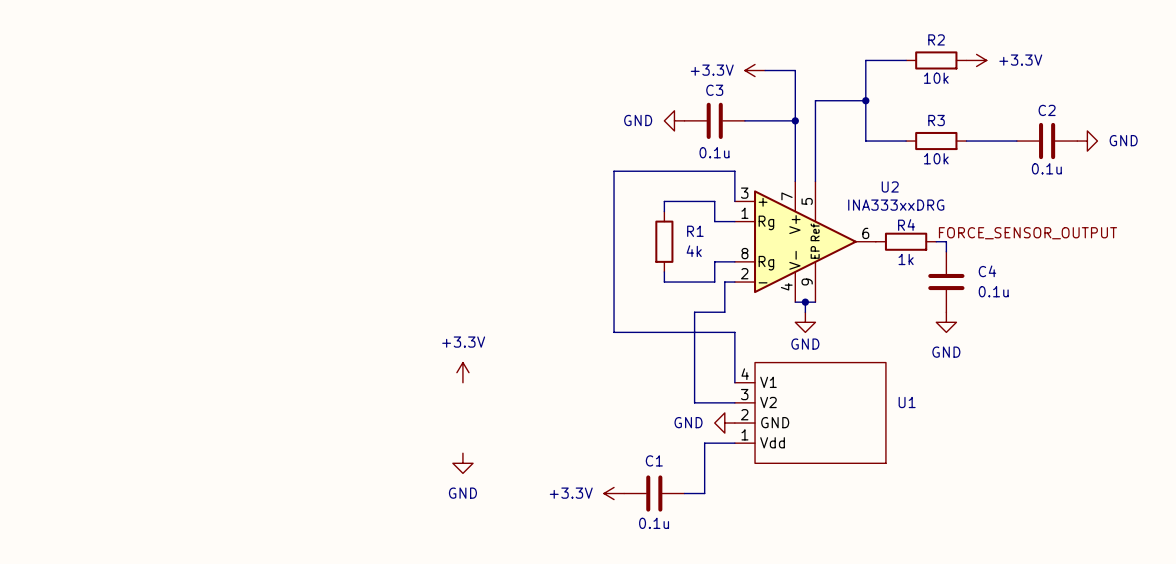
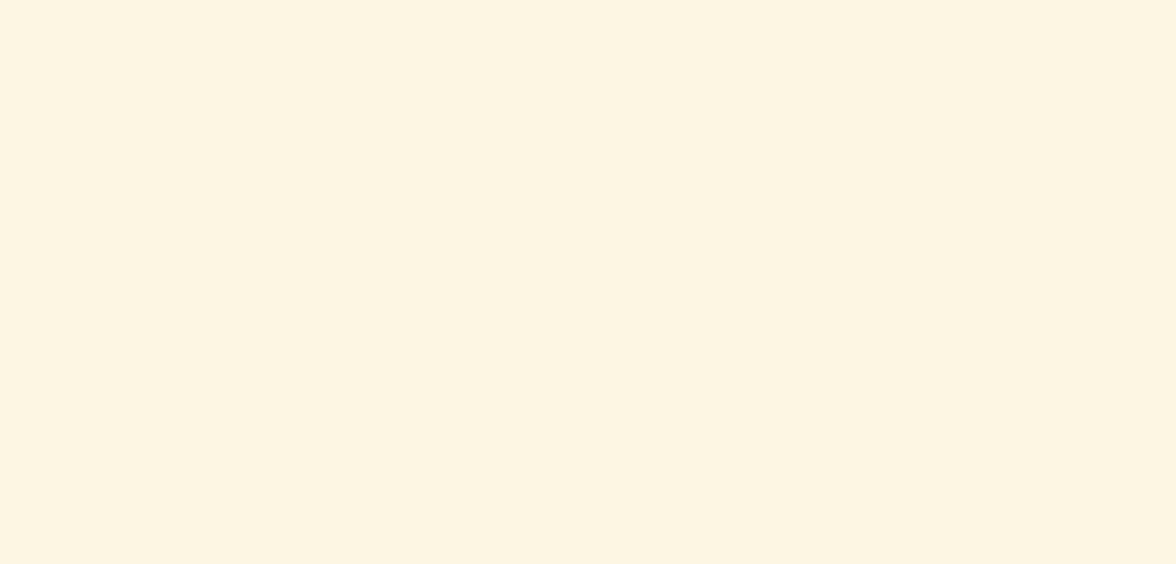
wire: (906, 60) (865, 60) (865, 141) (906, 141) -> none
R2: 10k (936, 60) -> none
power symbol: +3.3V (976, 60) -> none
power symbol: +3.3V (755, 70) -> none
wire: (765, 70) (795, 70) (795, 181) -> none
wire: (865, 100) (815, 100) (815, 181) -> none
junction: (865, 100) -> none
power symbol: GND (674, 120) -> none
C3: 0.1u (714, 120) -> none
wire: (744, 120) (795, 120) -> none
junction: (795, 120) -> none
R3: 10k (936, 141) -> none
wire: (966, 141) (1016, 141) -> none
C2: 0.1u (1047, 141) -> none
power symbol: GND (1087, 141) -> none
wire: (734, 201) (734, 171) (614, 171) (614, 332) (734, 332) (734, 382) -> none
wire: (664, 211) (664, 201) (714, 201) (714, 221) (734, 221) -> none
label: FORCE_SENSOR_OUTPUT (1027, 233) -> none
R1: 4k (664, 241) -> none
U2: INA333xxDRG (805, 241) -> none
R4: 1k (906, 241) -> none
wire: (936, 241) (946, 241) (946, 251) -> none
wire: (734, 261) (714, 261) (714, 282) (664, 282) (664, 271) -> none
wire: (734, 282) (724, 282) (724, 312) (694, 312) (694, 402) (734, 402) -> none
C4: 0.1u (946, 282) -> none
wire: (795, 302) (815, 302) -> none
wire: (805, 302) (805, 312) -> none
junction: (805, 302) -> none
power symbol: GND (805, 322) -> none
power symbol: GND (946, 322) -> none
power symbol: +3.3V (462, 372) -> none
U1: (810, 412) -> none
power symbol: GND (724, 423) -> none
wire: (734, 443) (704, 443) (704, 493) (684, 493) -> none
power symbol: GND (462, 463) -> none
power symbol: +3.3V (614, 493) -> none
C1: 0.1u (654, 493) -> none

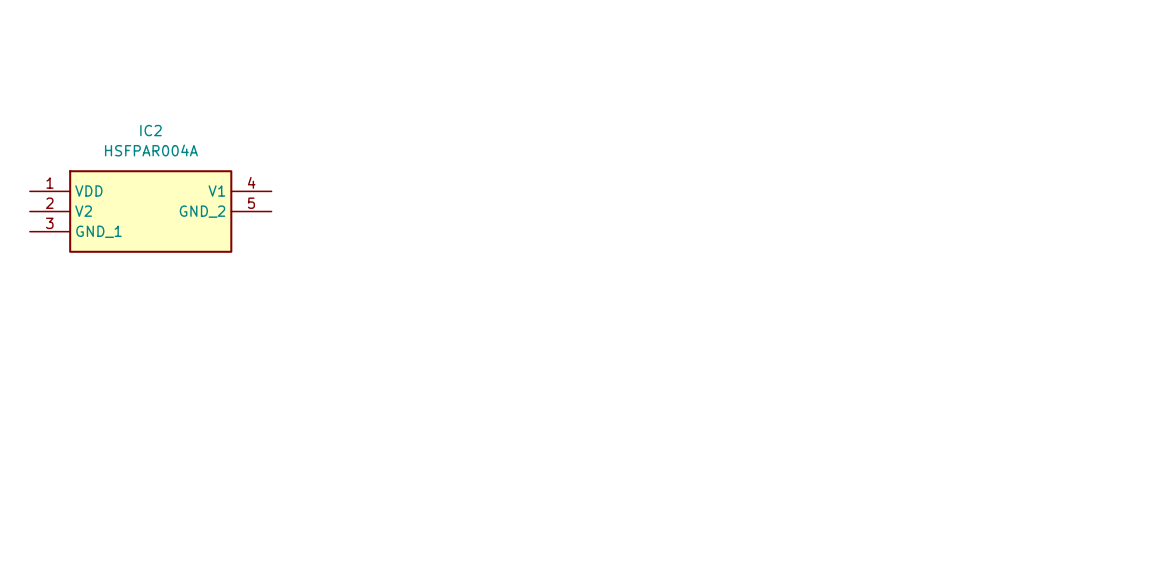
IC2: none -> HSFPAR004A (150, 211)

